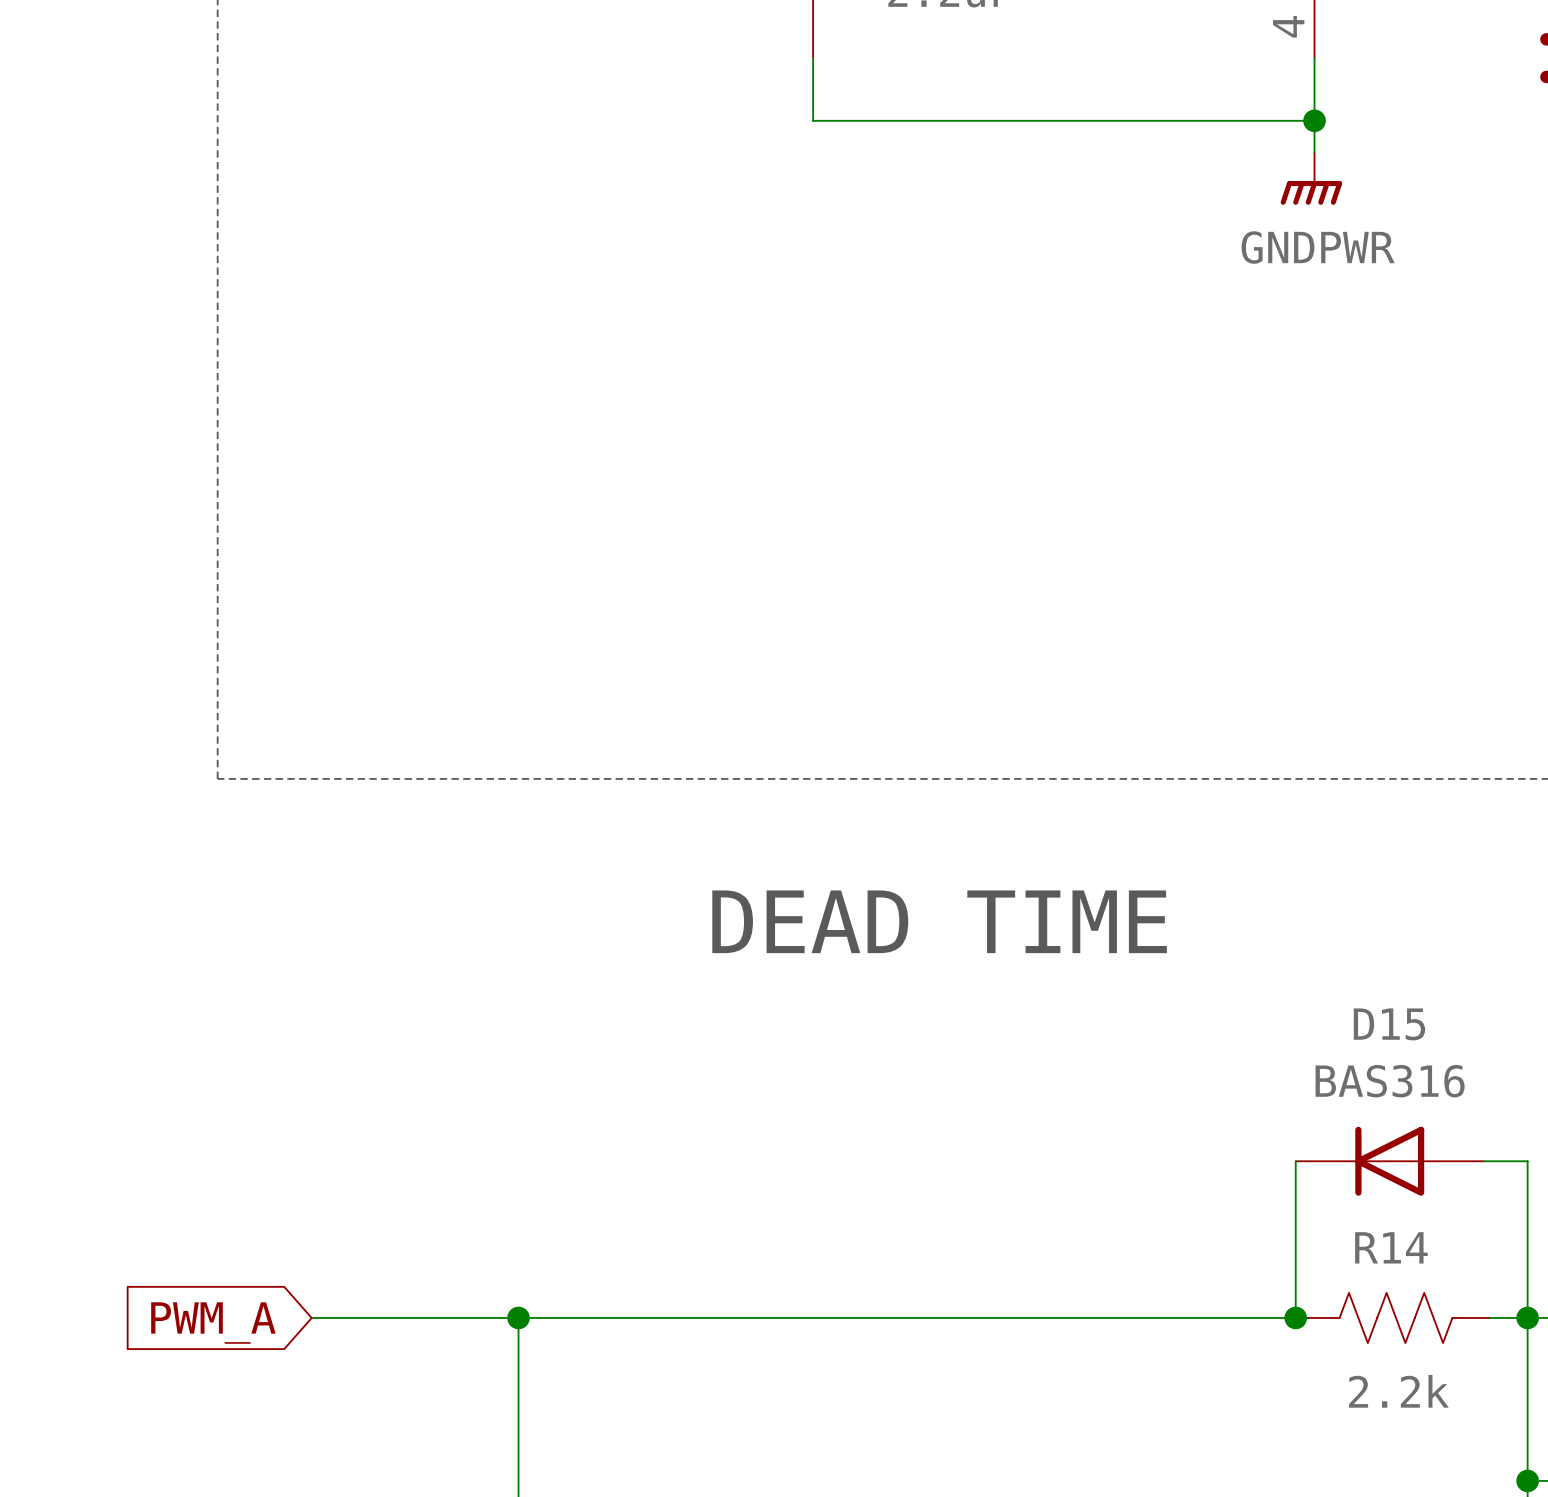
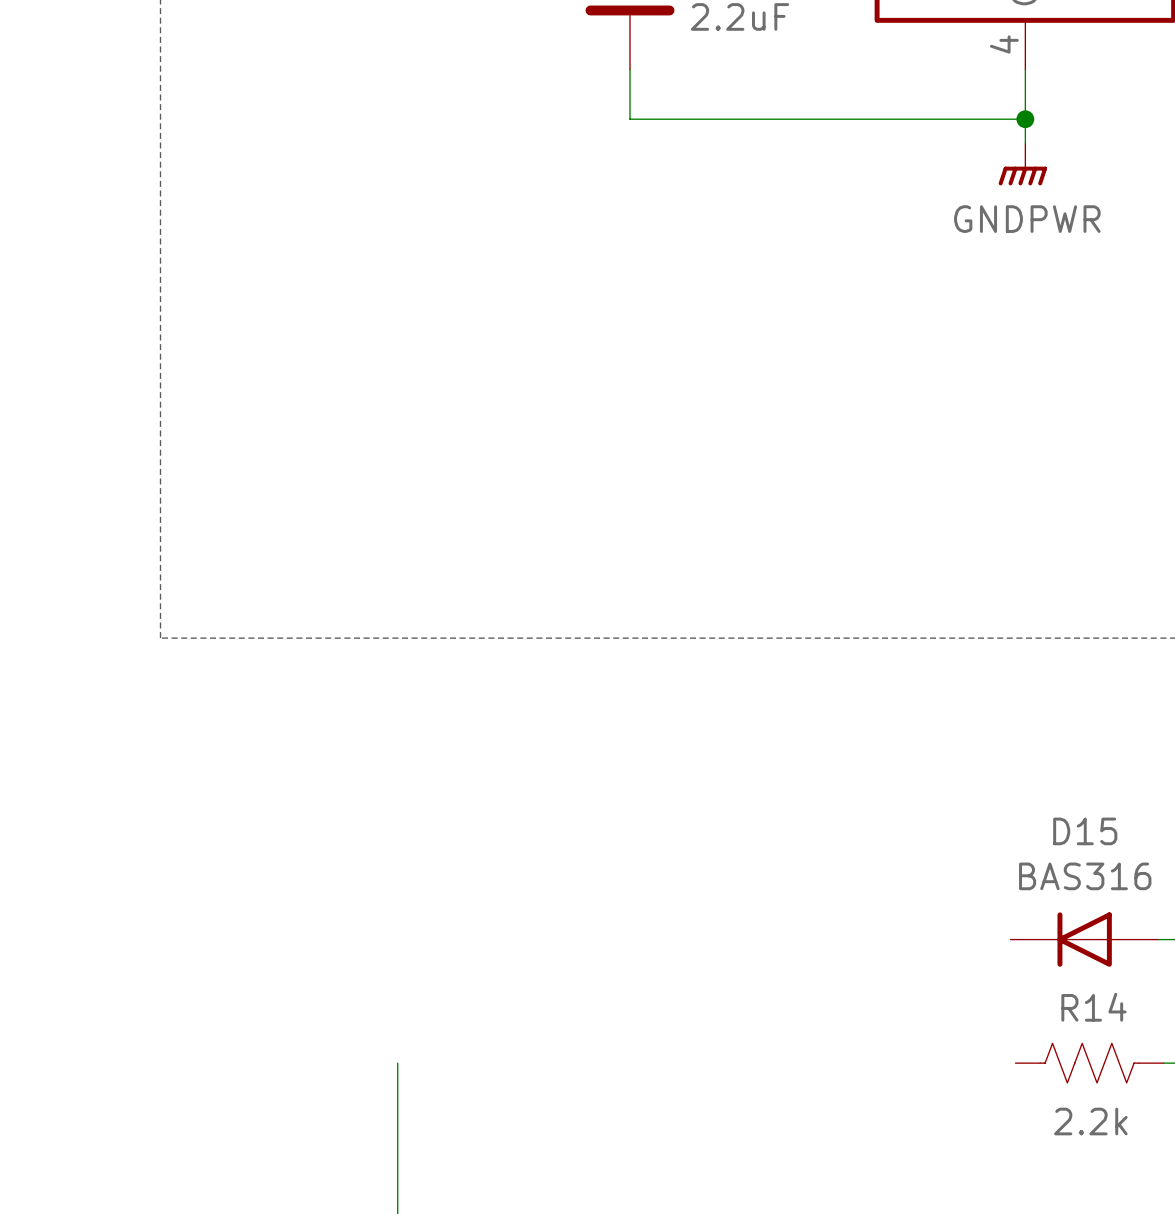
text: DEAD TIME (939, 921) -> none
wire: (1295, 1161) (1295, 1317) -> none
wire: (311, 1317) (1301, 1317) -> none
junction: (518, 1317) -> none
junction: (1295, 1317) -> none
global label: PWM_A (213, 1323) -> none

